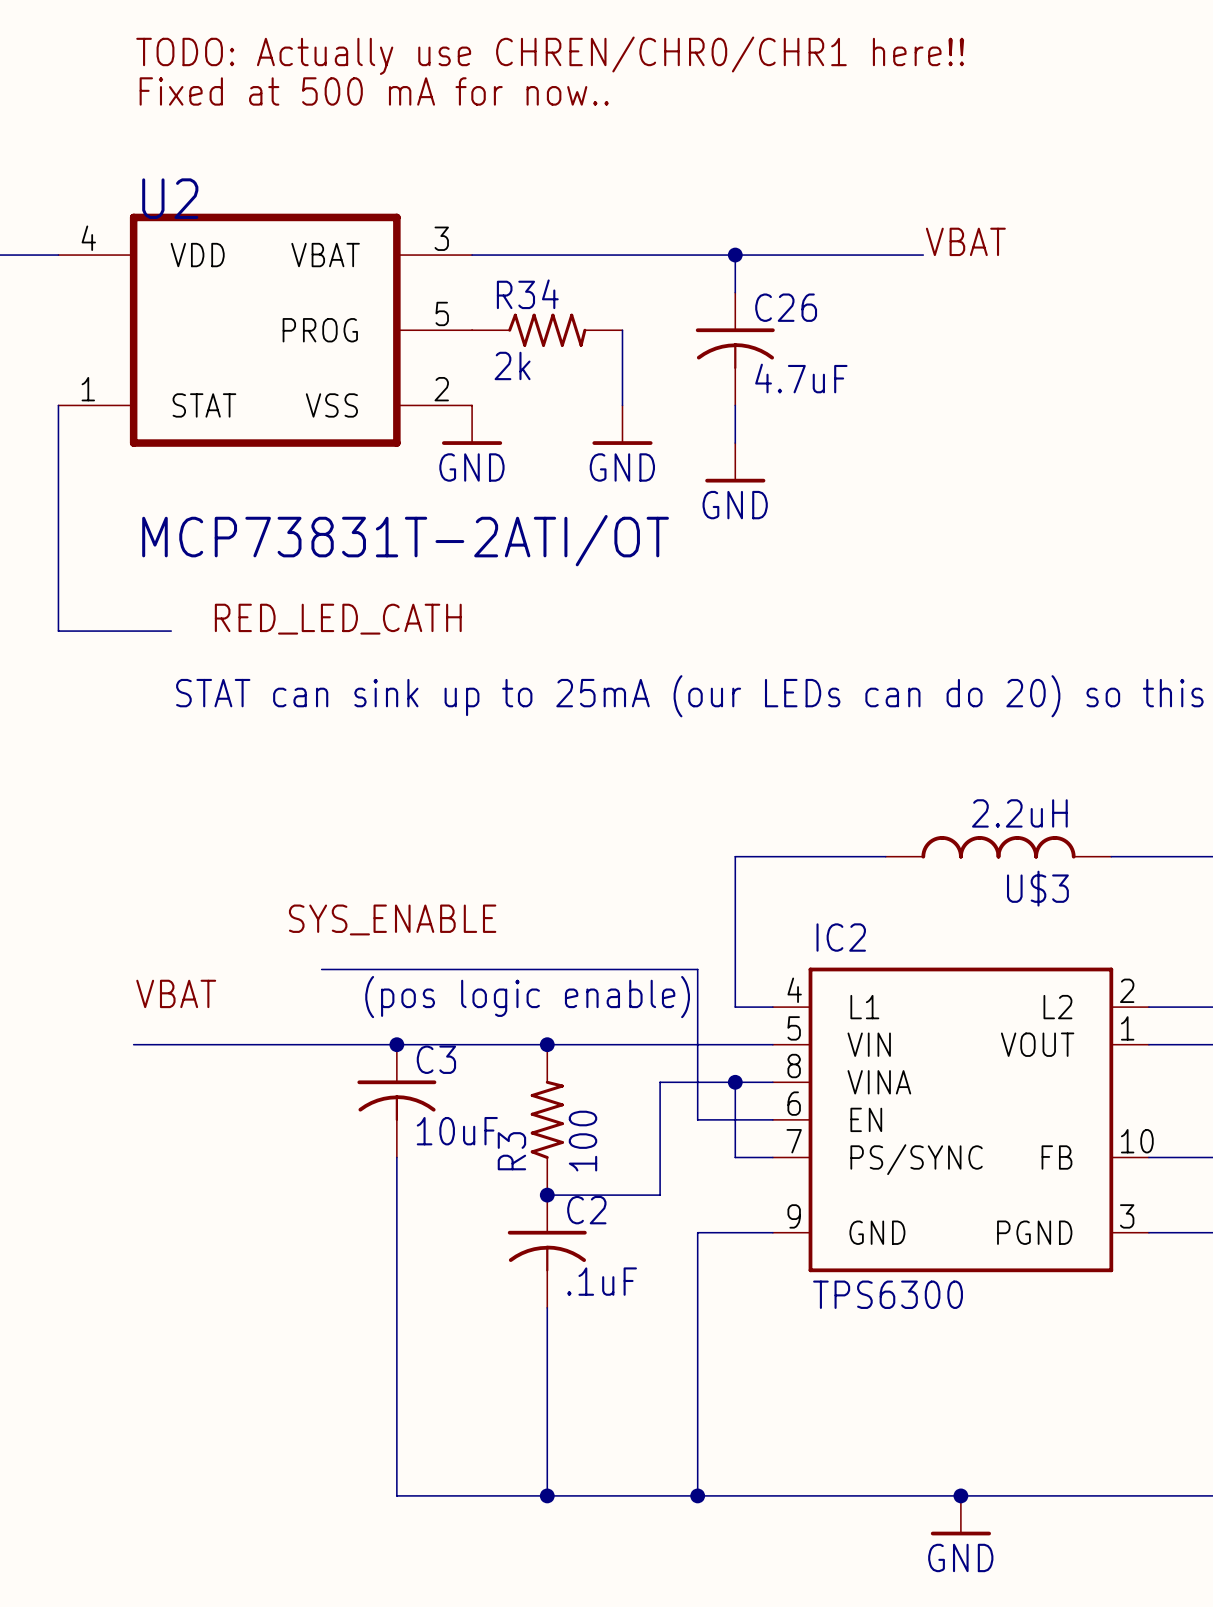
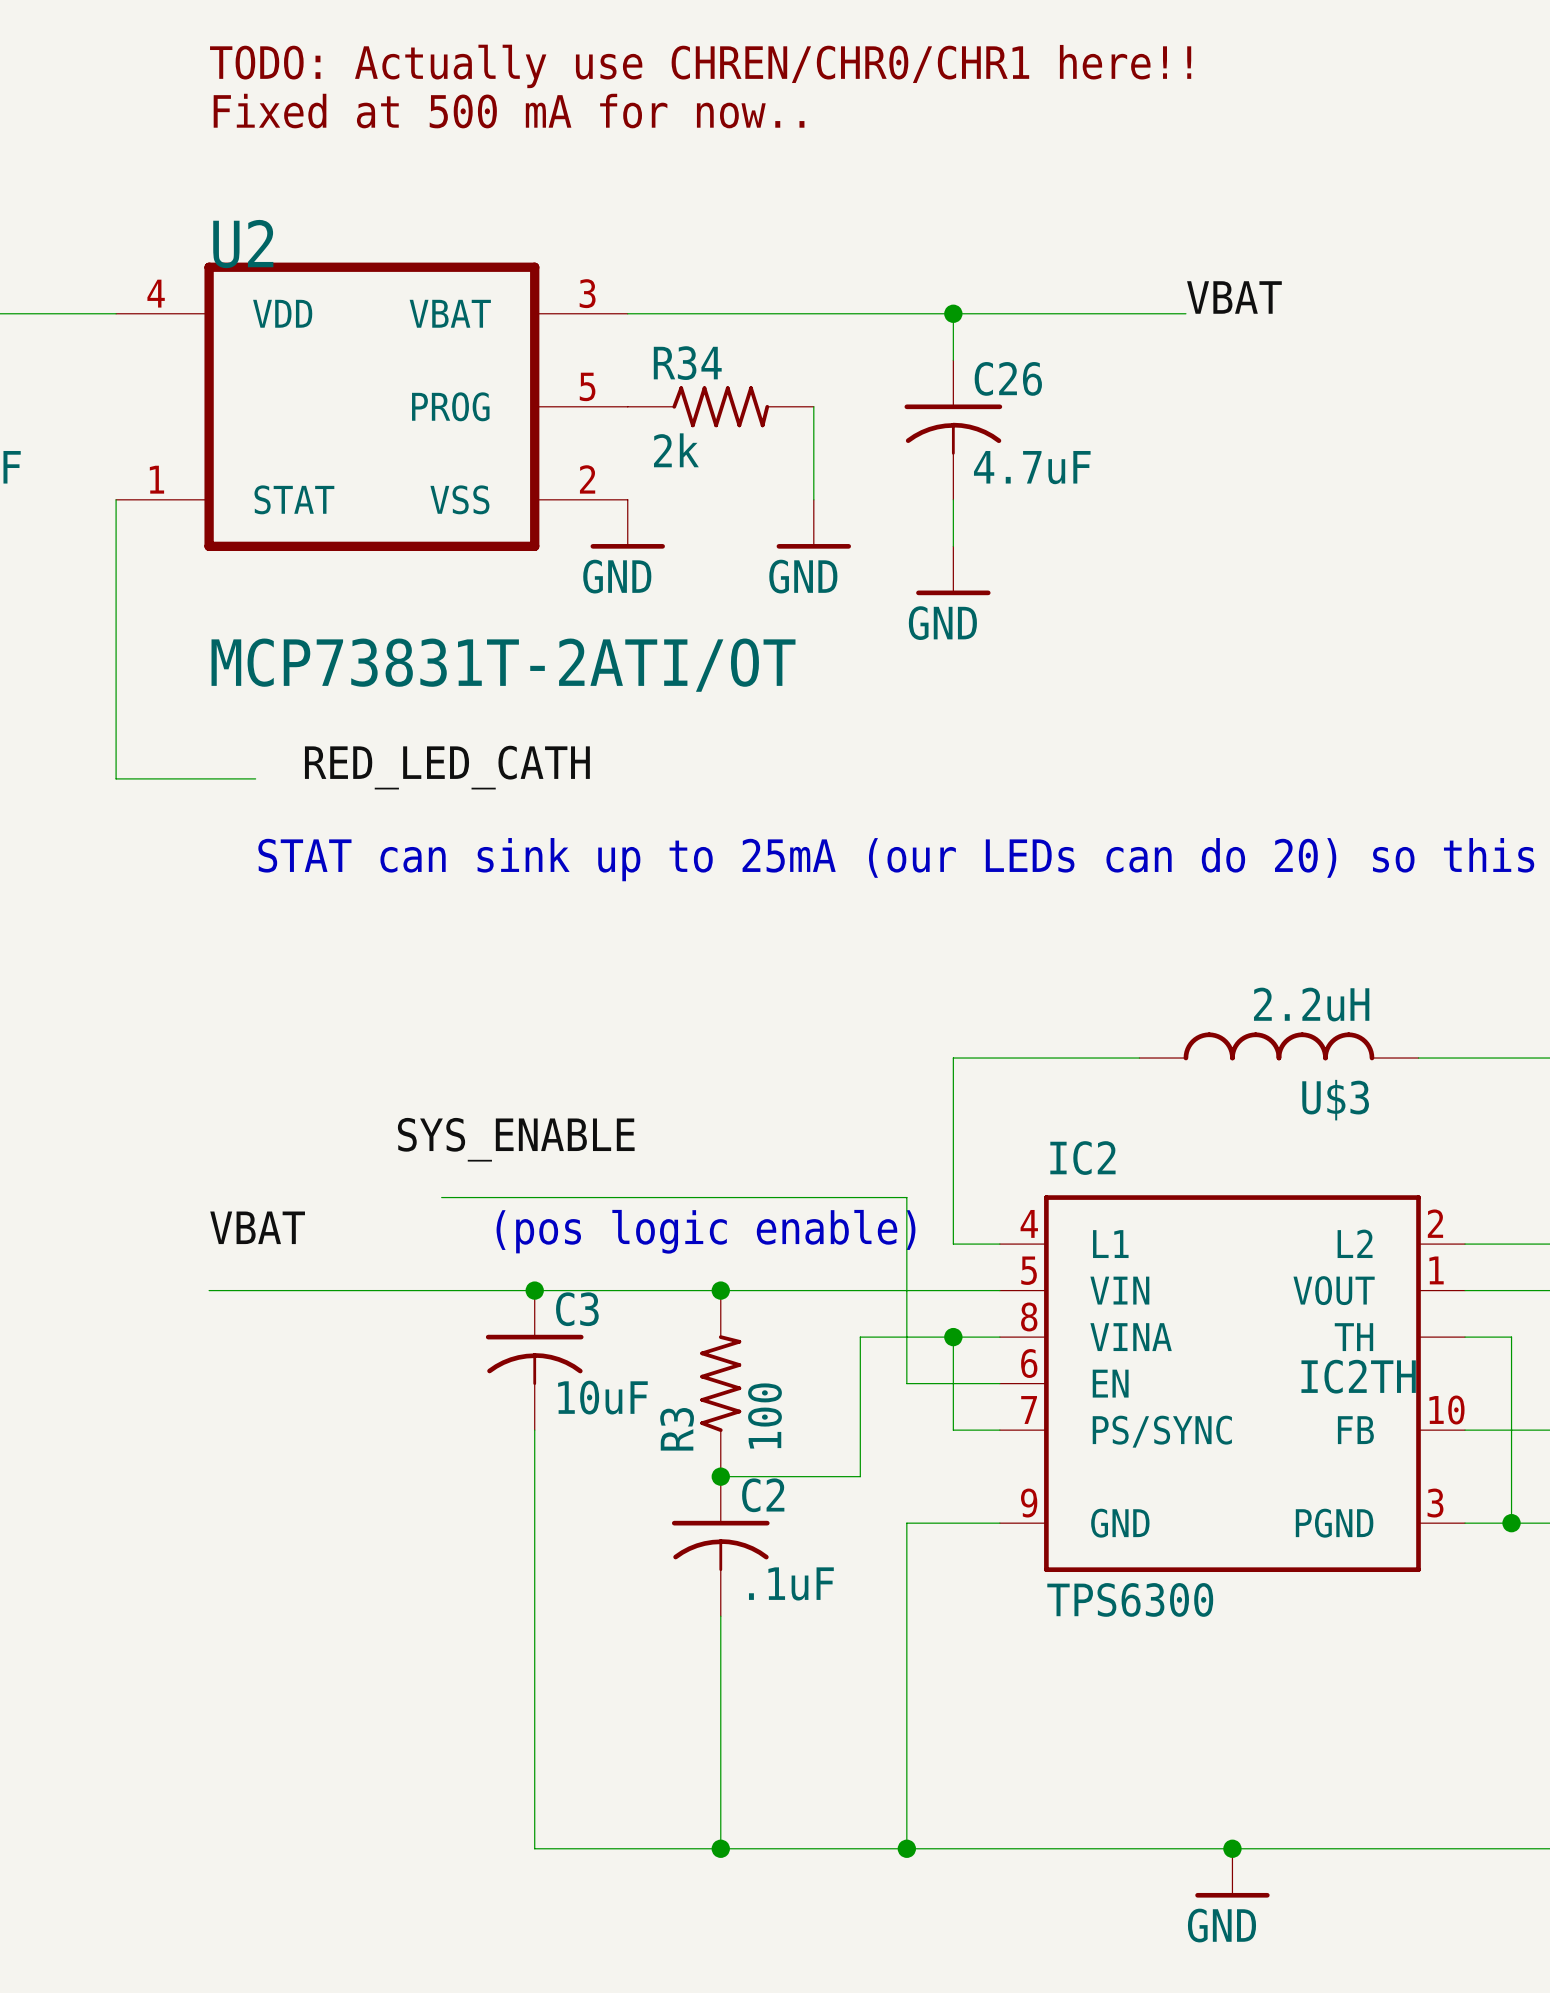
IC2TH: none -> (1441, 1337)
wire: none -> (1465, 1337) (1511, 1337) (1511, 1523)
junction: none -> (1511, 1523)

